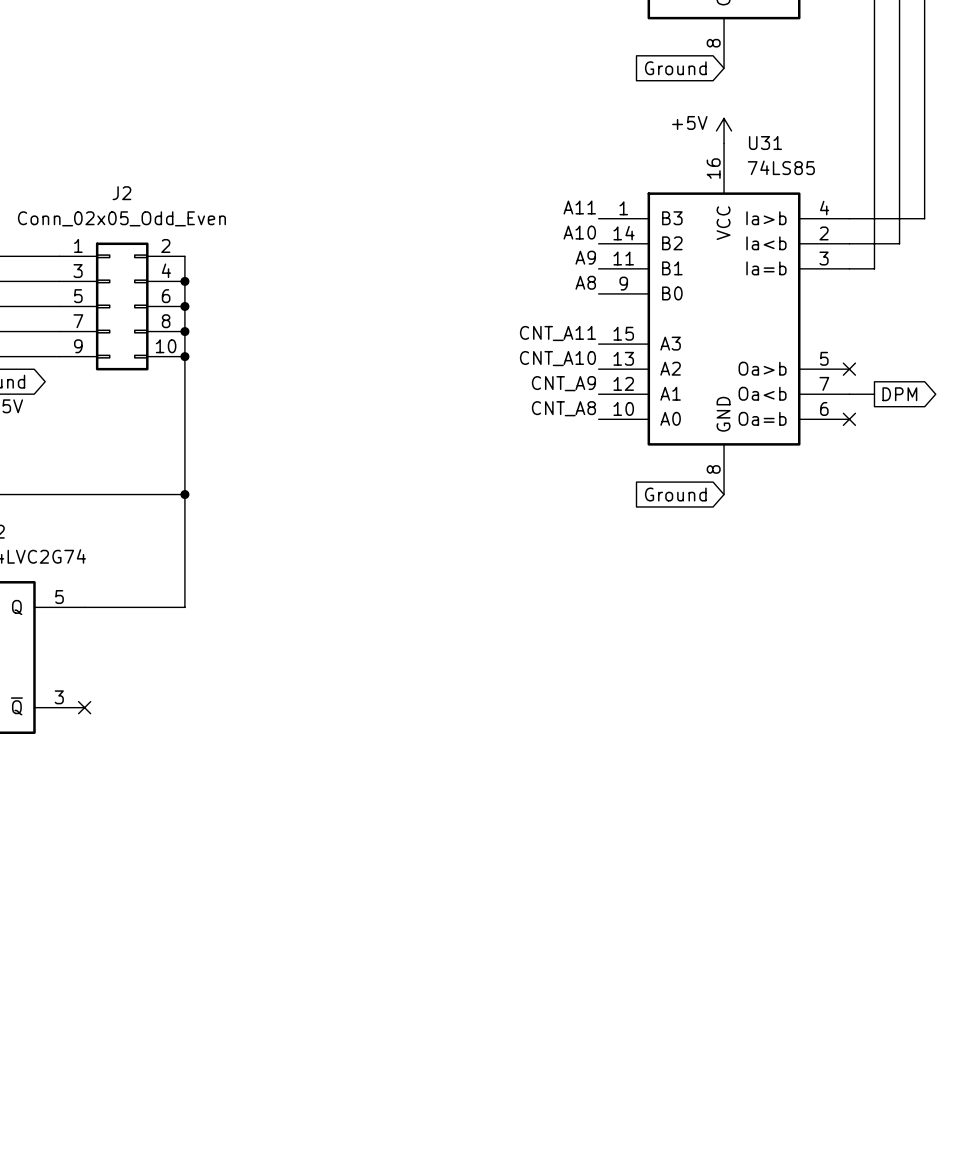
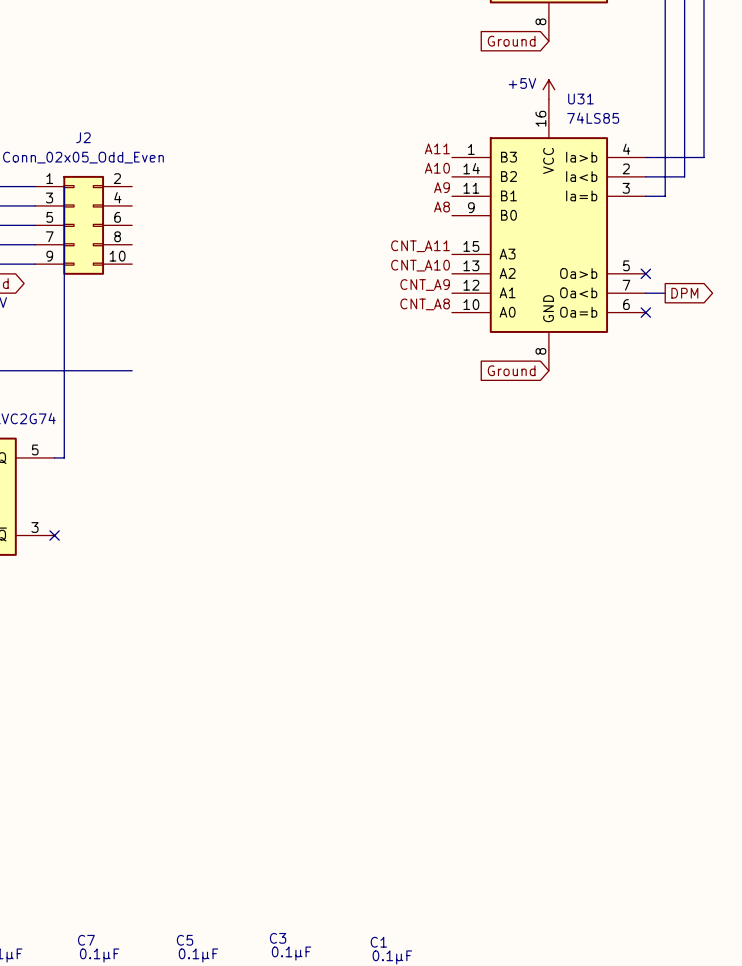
wire: (184, 256) (184, 607) (97, 607) -> (64, 186) (64, 457)
junction: (184, 281) -> none
junction: (184, 306) -> none
junction: (184, 331) -> none
junction: (184, 356) -> none
junction: (184, 494) -> none

